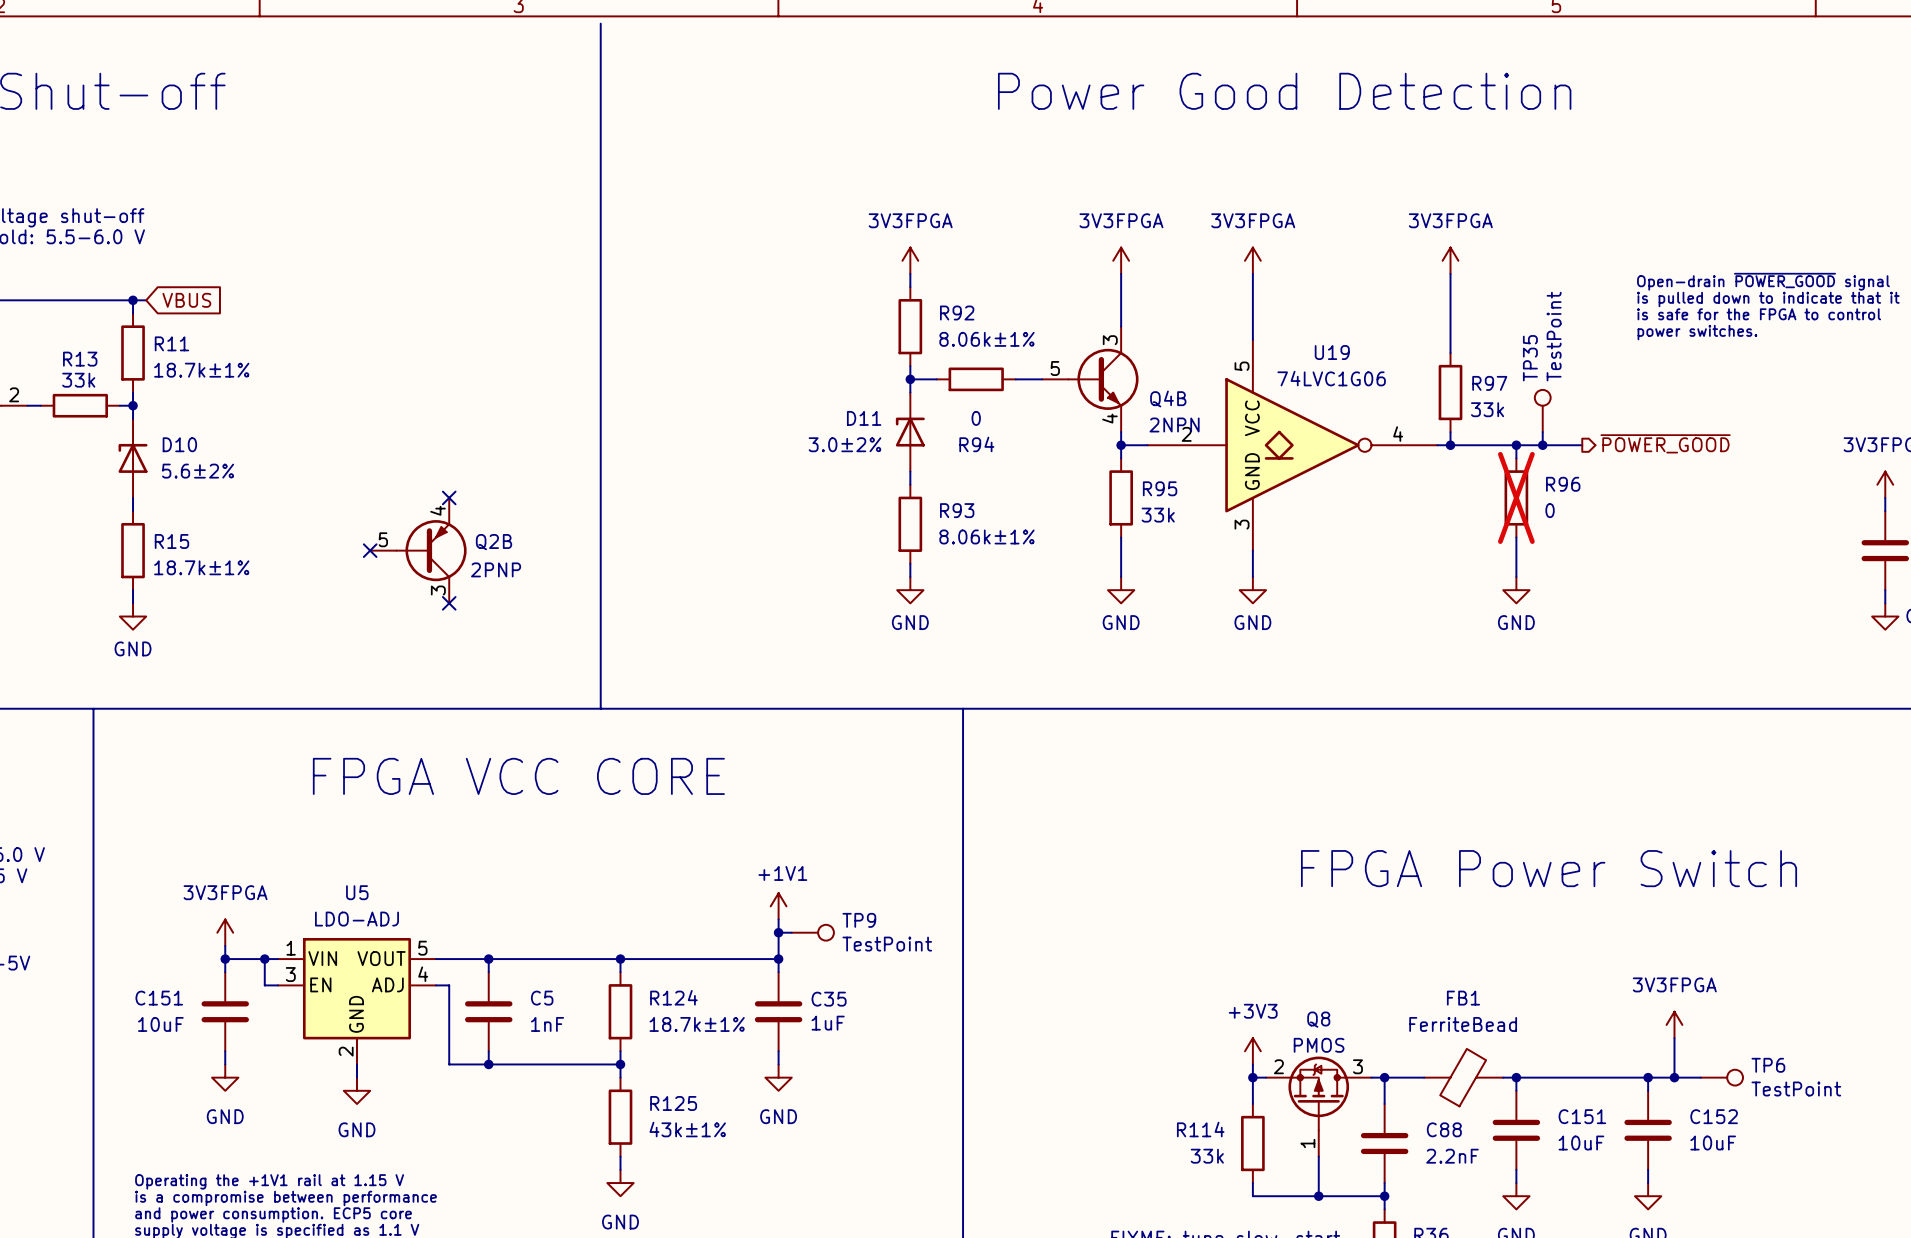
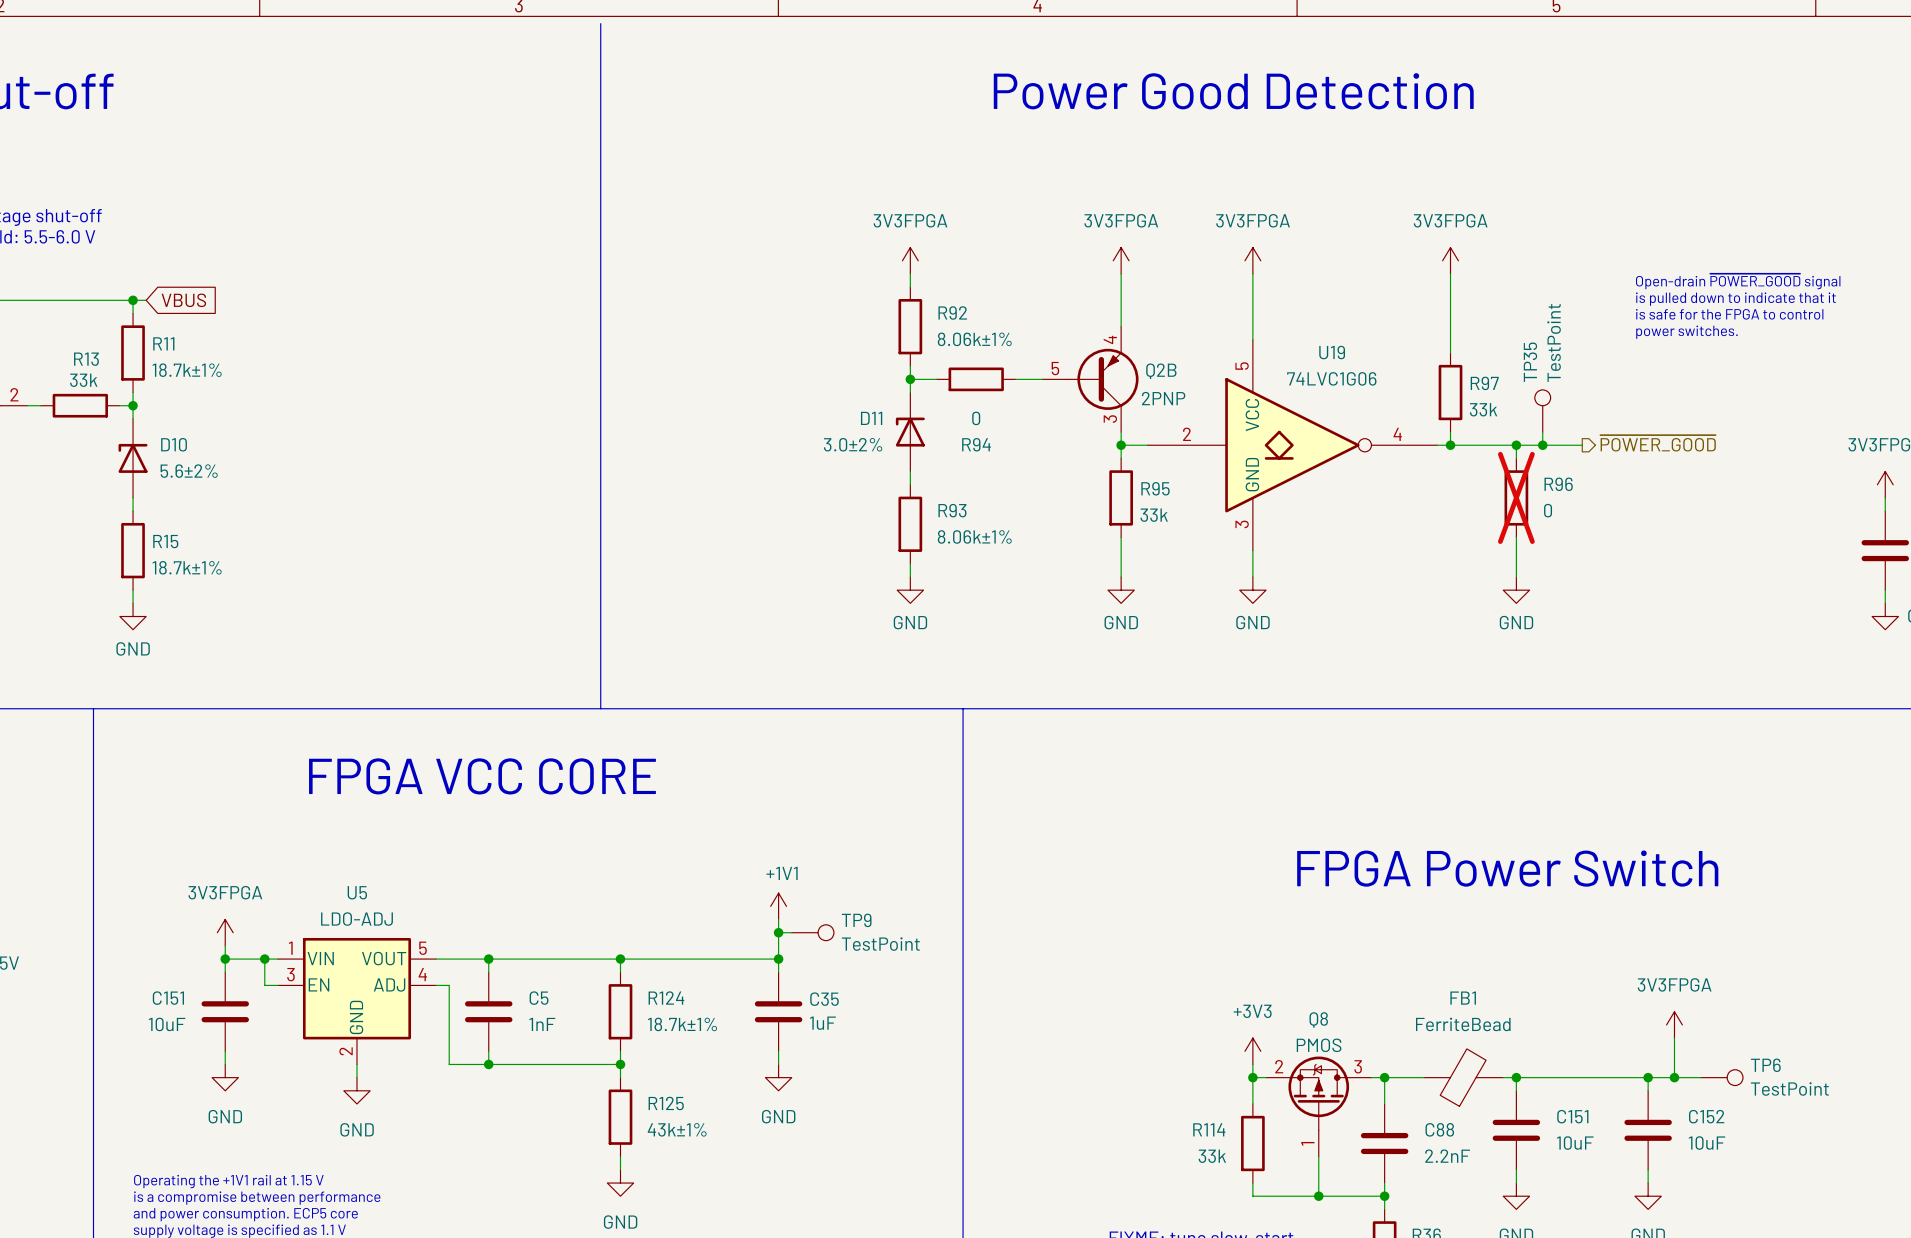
Q4B: 2NPN (1090, 379) -> none
no-connect mark: (449, 497) -> none
no-connect mark: (370, 550) -> none
Q2B position: (418, 550) -> (1090, 379)
no-connect mark: (449, 603) -> none

